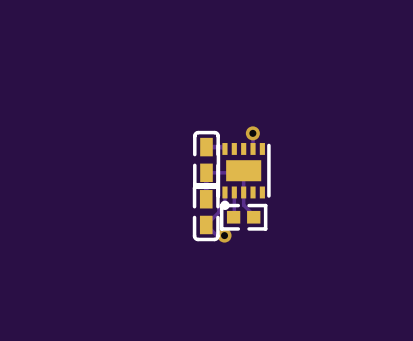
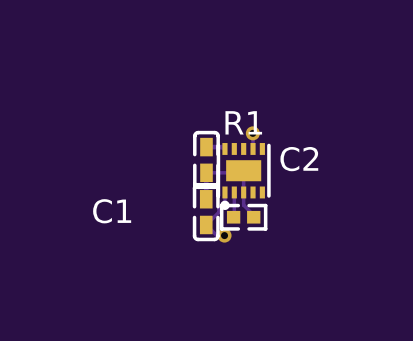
R1 name: none -> R1 (243, 122)
C2 name: none -> C2 (299, 159)
C1 name: none -> C1 (112, 211)

